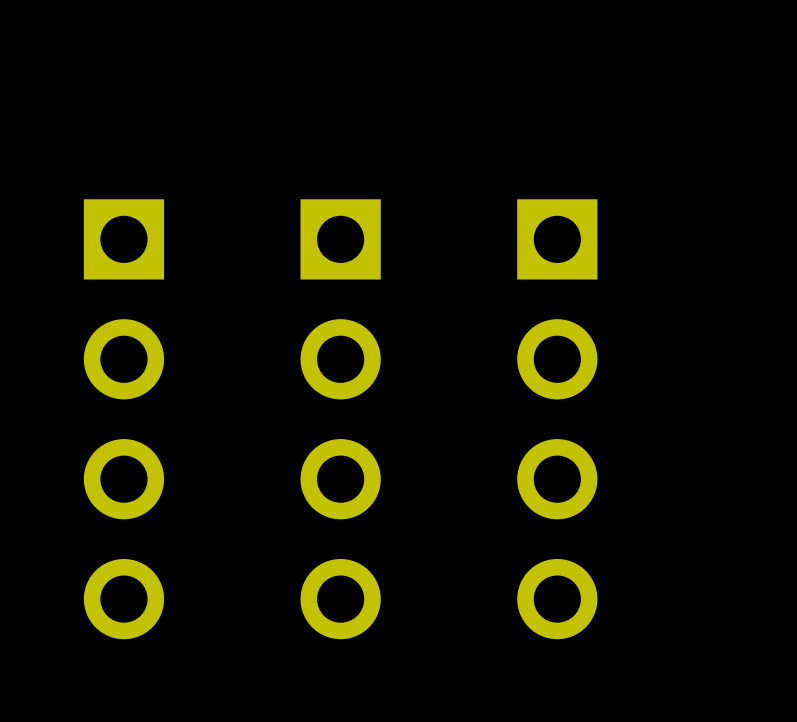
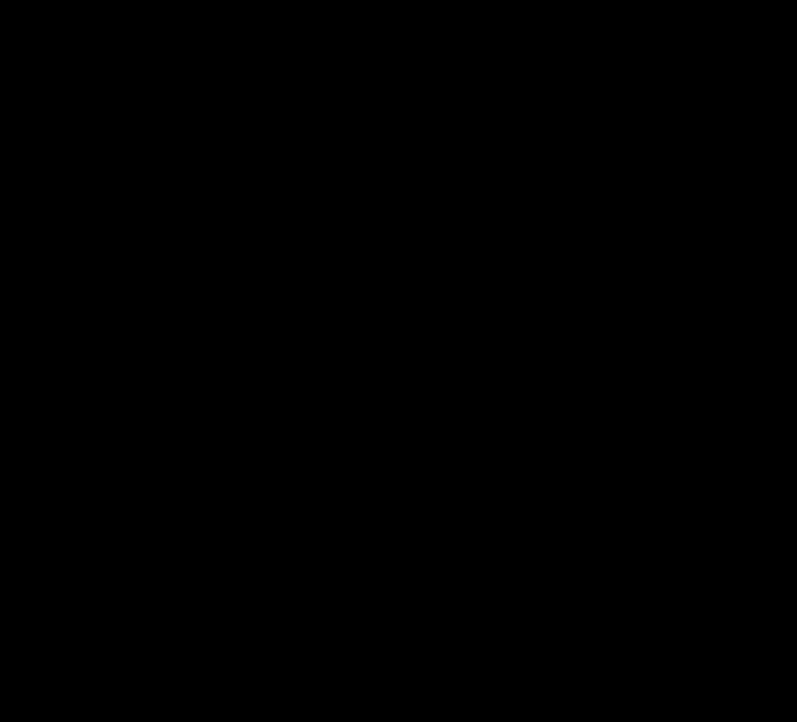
part: (123, 419) -> none
part: (340, 419) -> none
part: (557, 419) -> none

